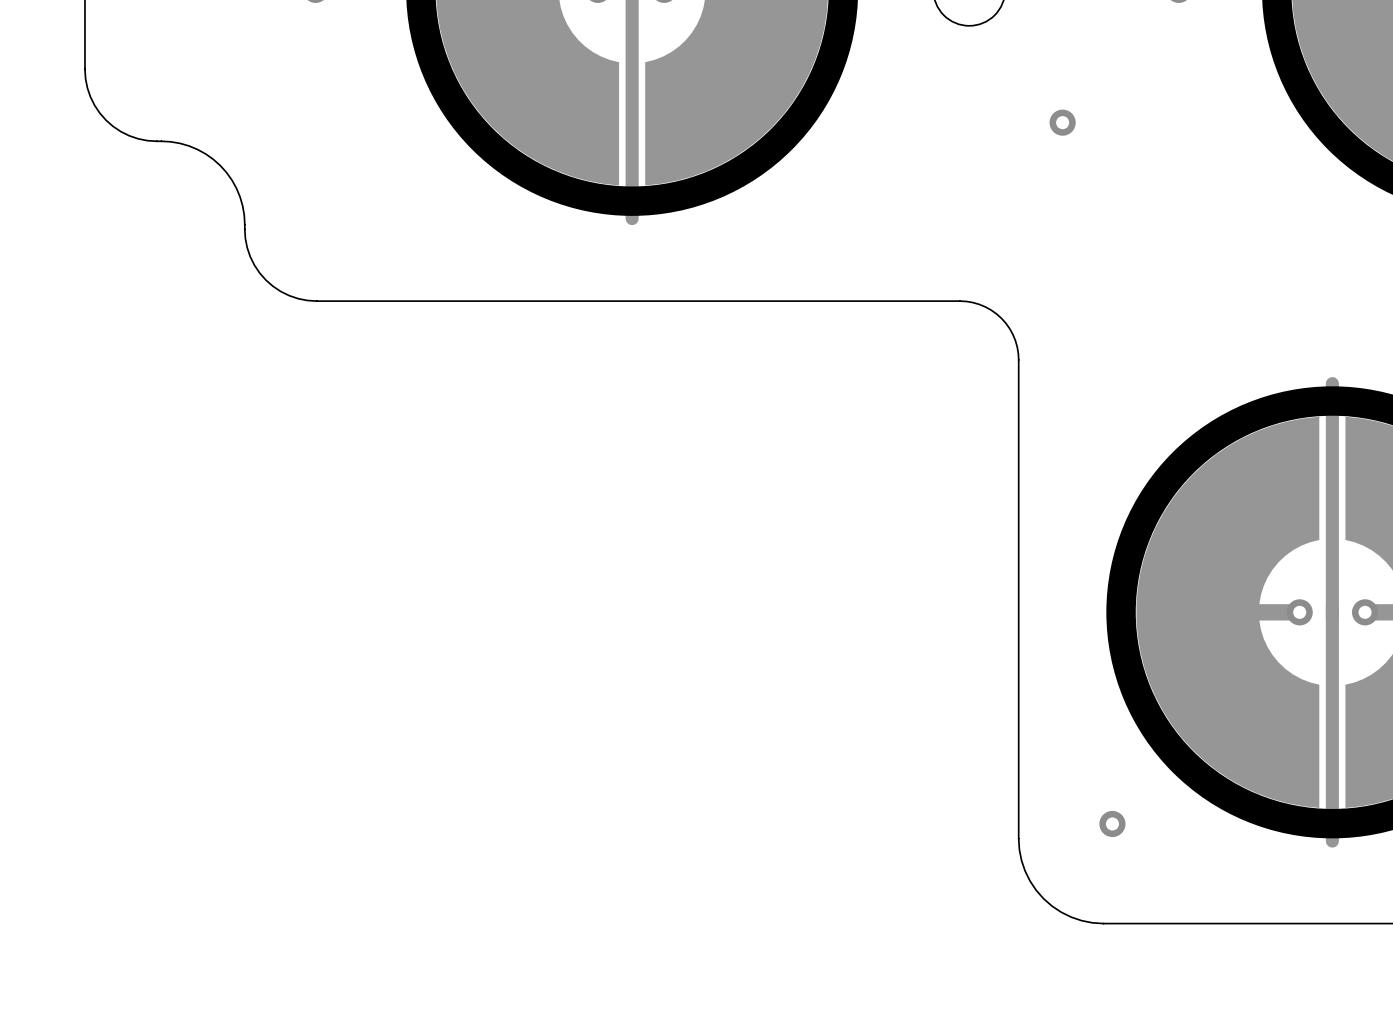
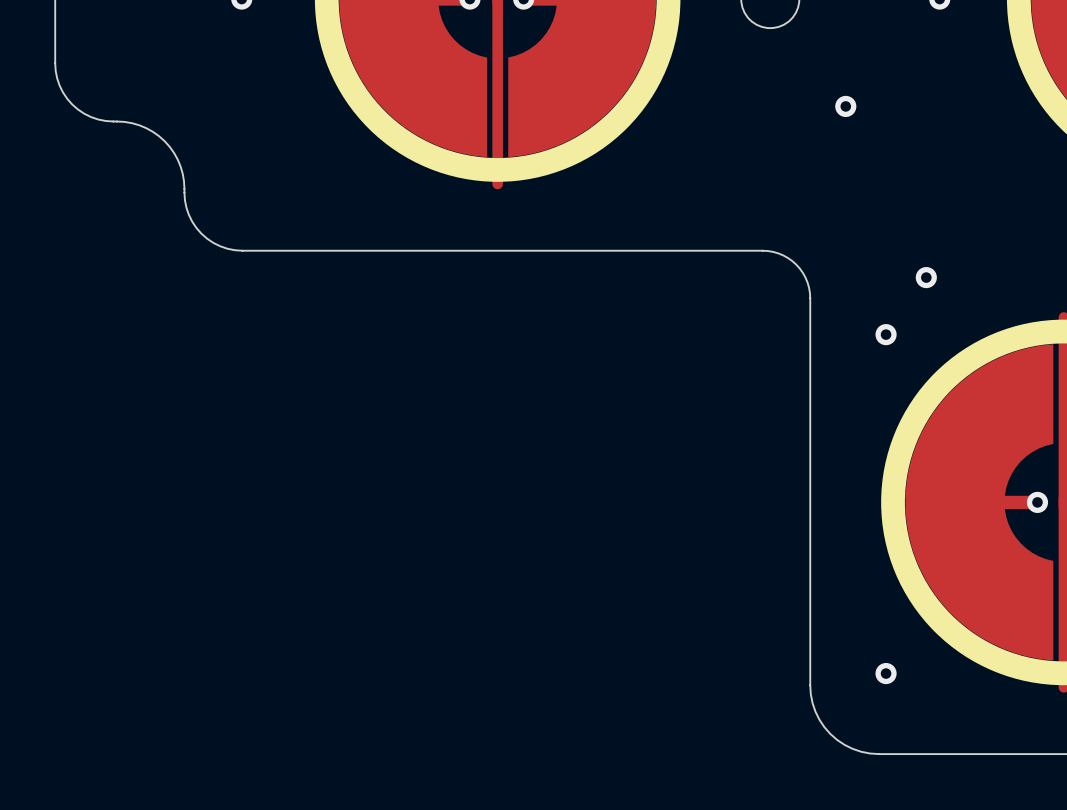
via: none -> (926, 277)
via: none -> (886, 334)

